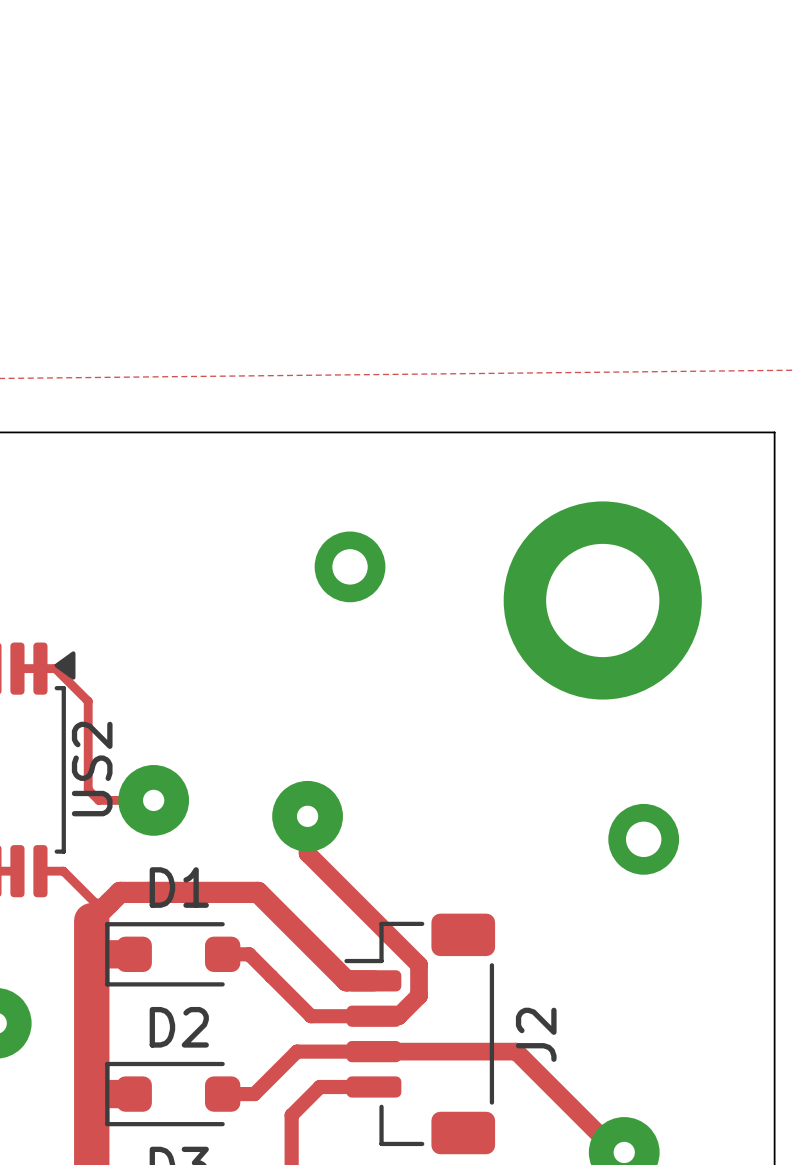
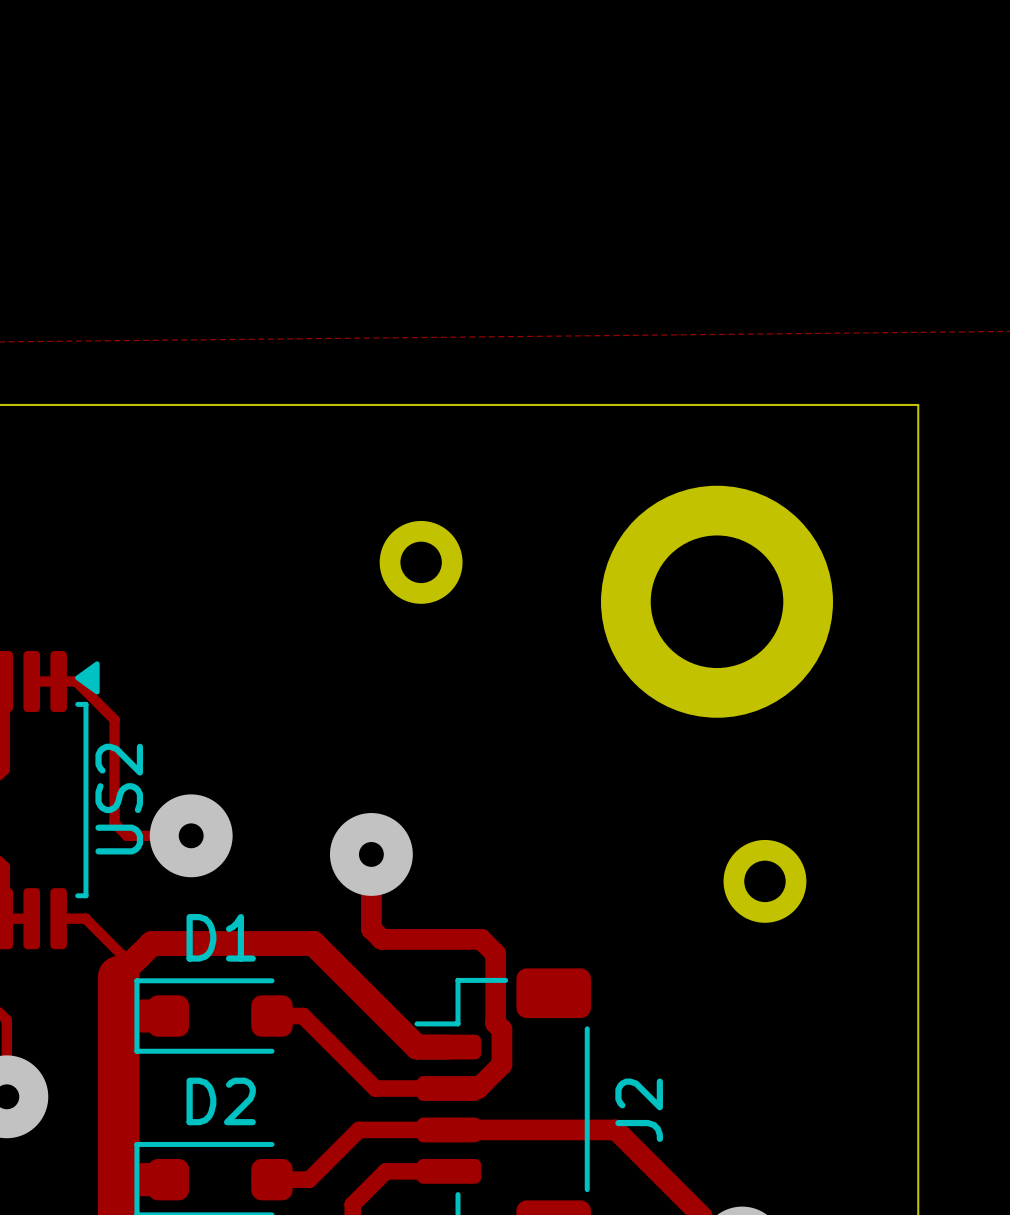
track: (307, 853) (419, 965) -> (371, 897) (371, 929) (381, 939) (481, 939) (495, 953) (495, 1023) (501, 1029)

